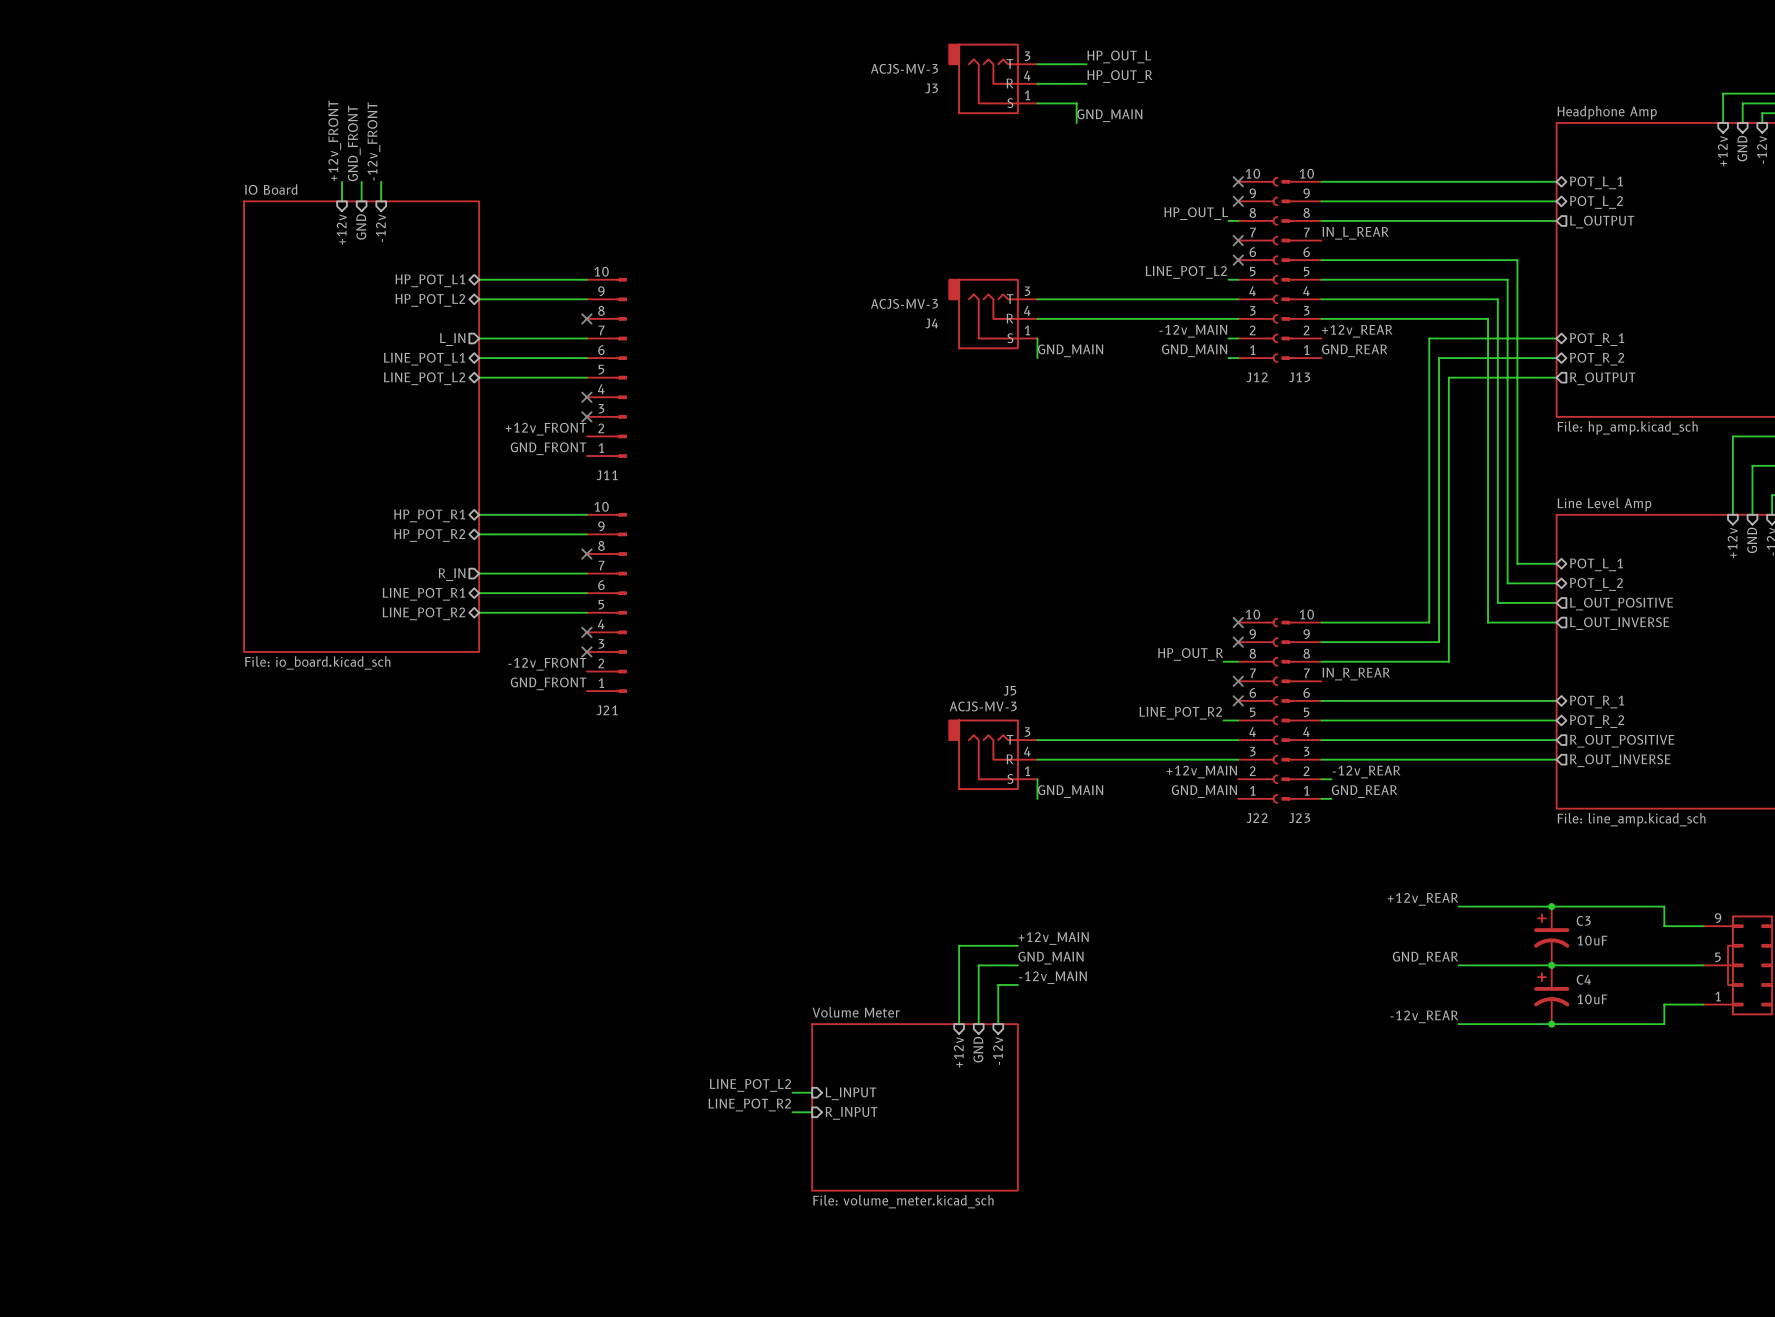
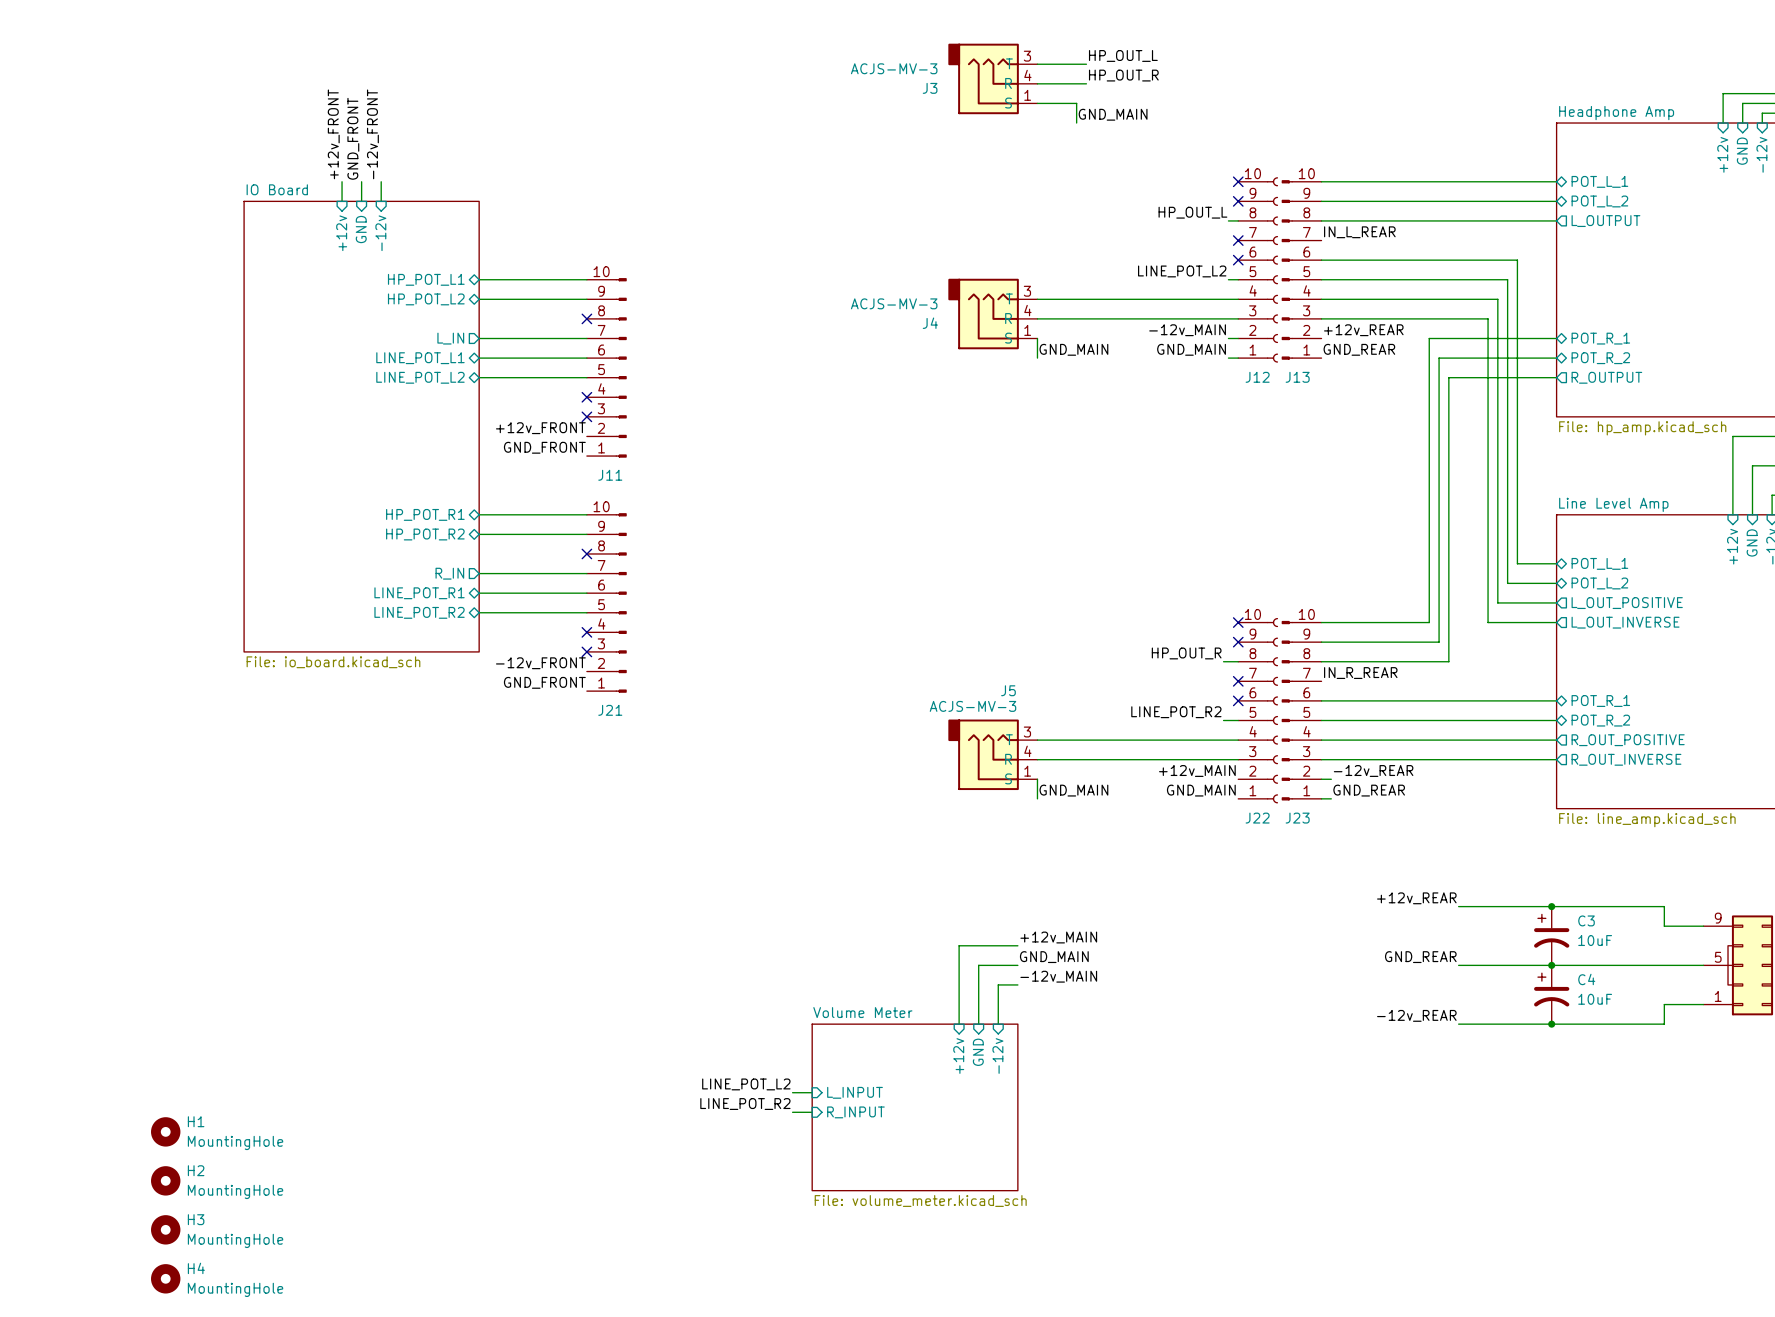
H1: none -> MountingHole (165, 1131)
H2: none -> MountingHole (165, 1180)
H3: none -> MountingHole (165, 1229)
H4: none -> MountingHole (165, 1278)

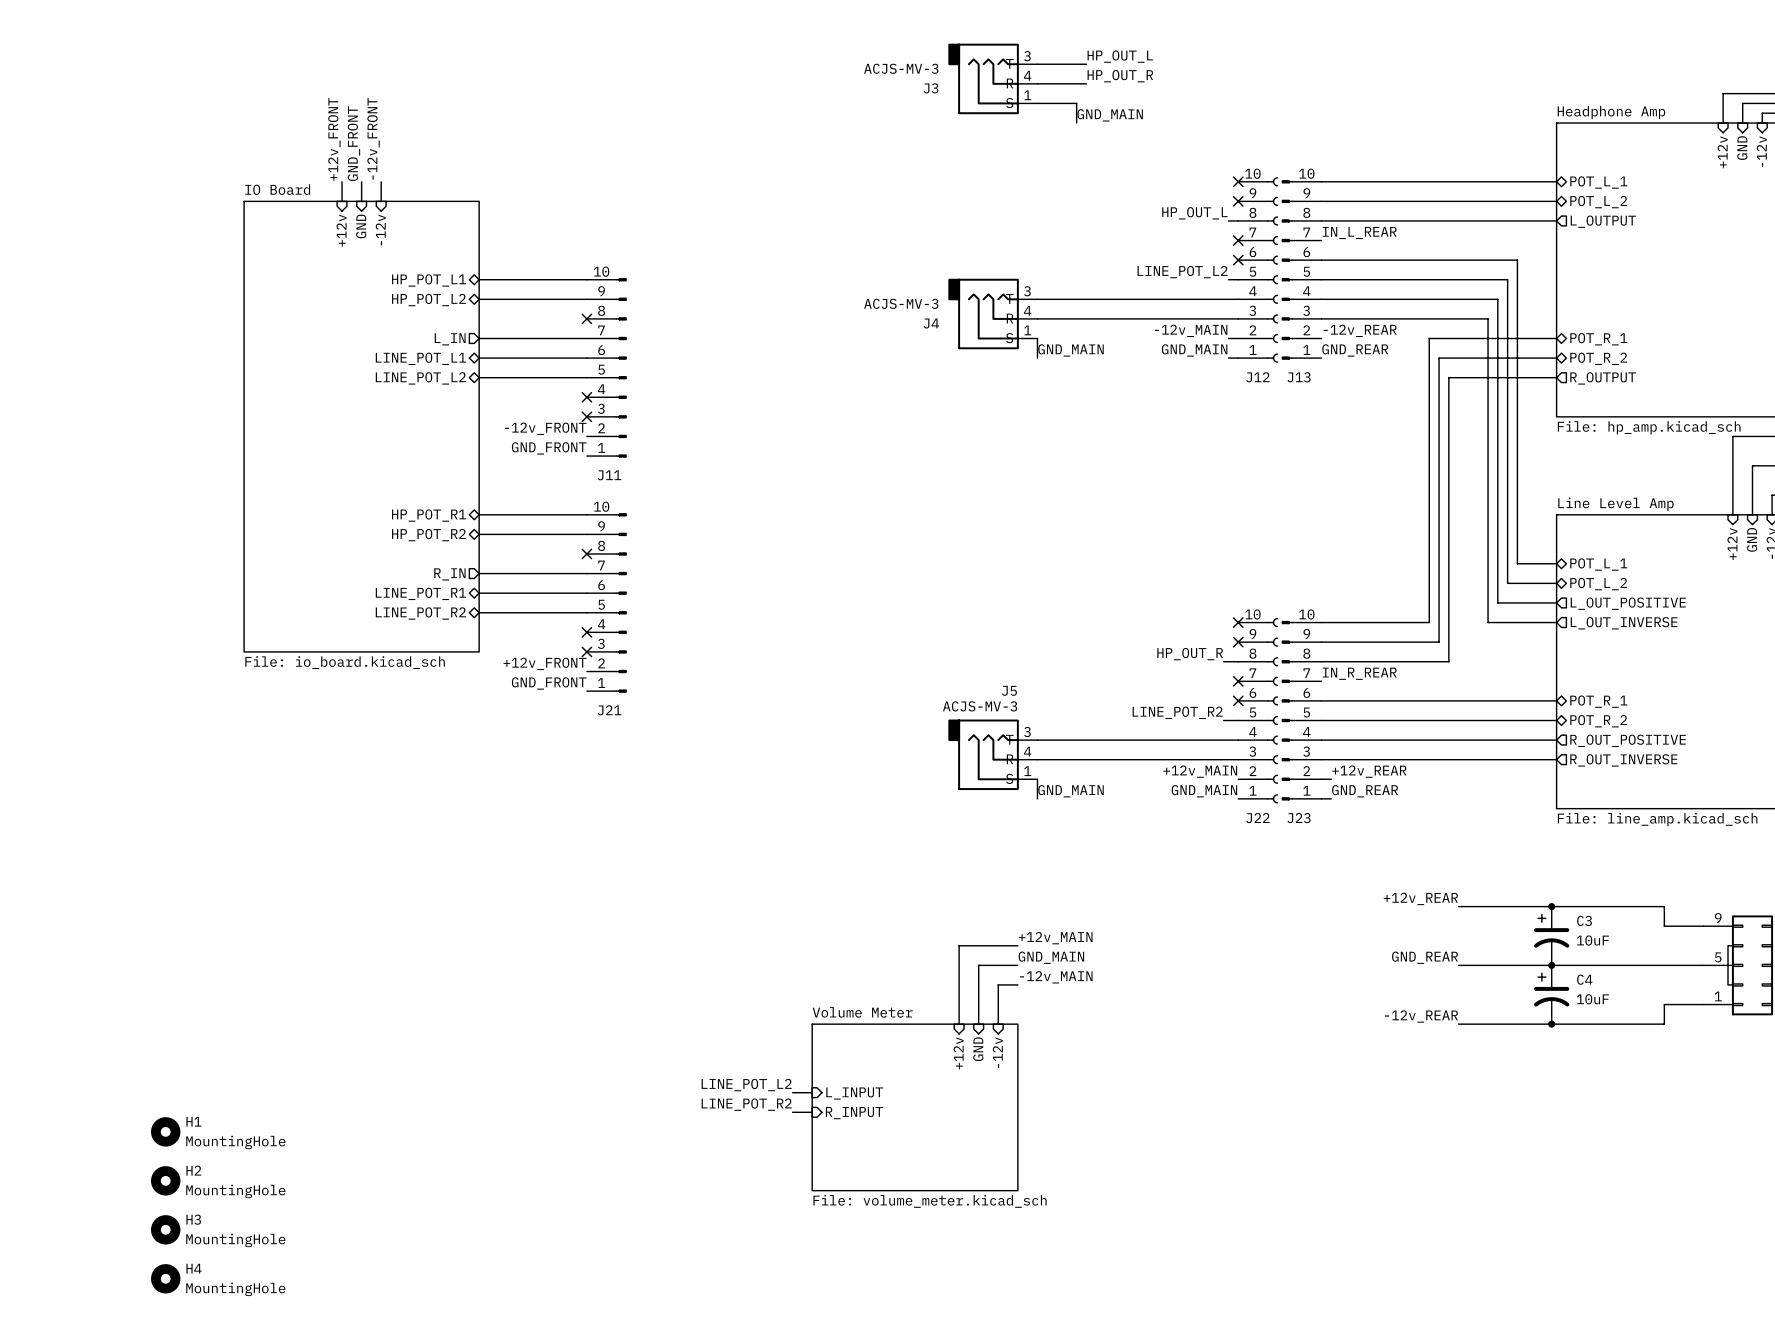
label: +12v_REAR (1363, 330) -> -12v_REAR (1360, 330)
label: +12v_FRONT (540, 428) -> -12v_FRONT (545, 428)
label: -12v_FRONT (540, 663) -> +12v_FRONT (545, 663)
label: -12v_REAR (1373, 770) -> +12v_REAR (1369, 771)

